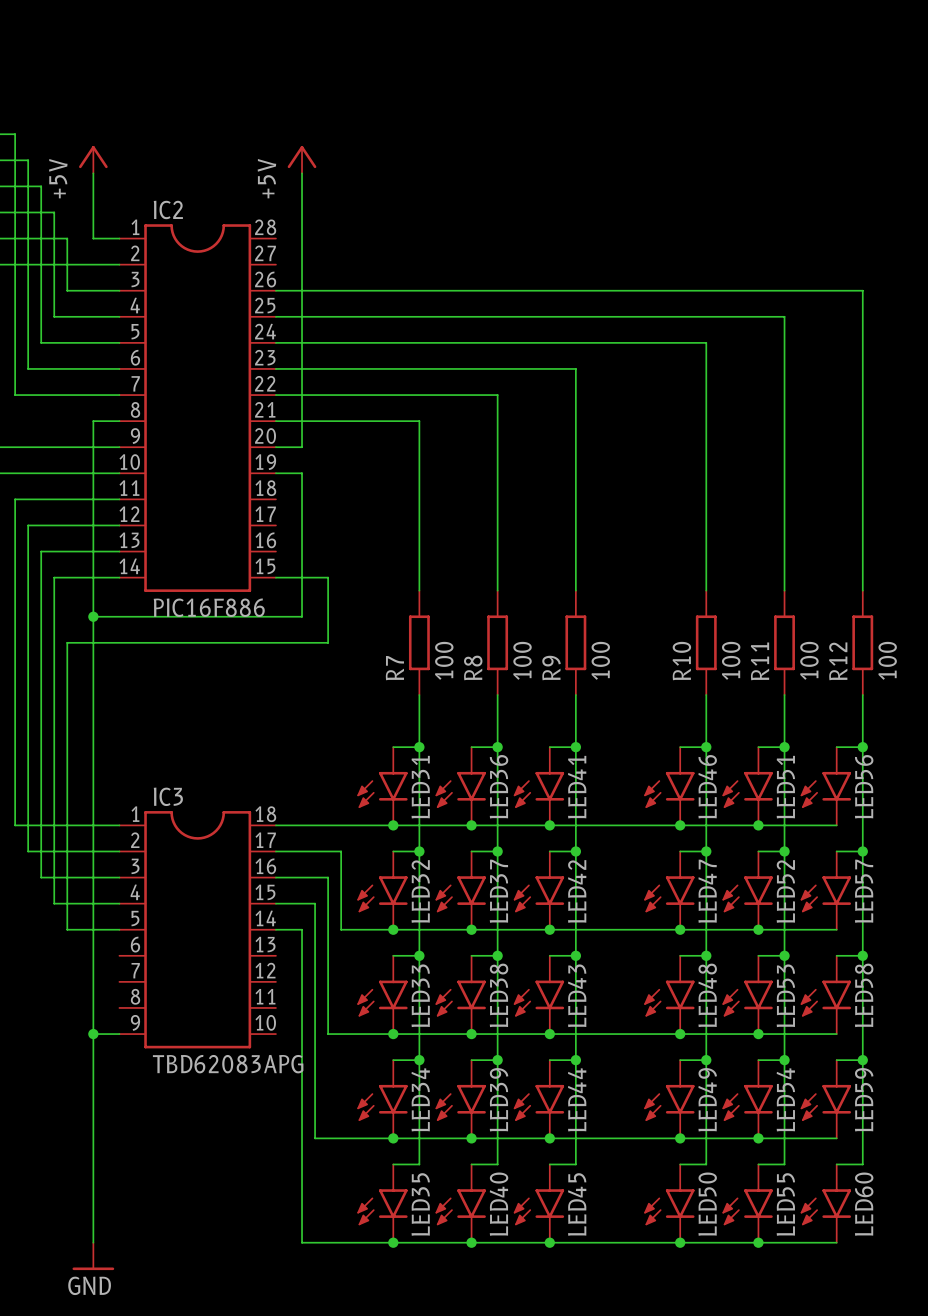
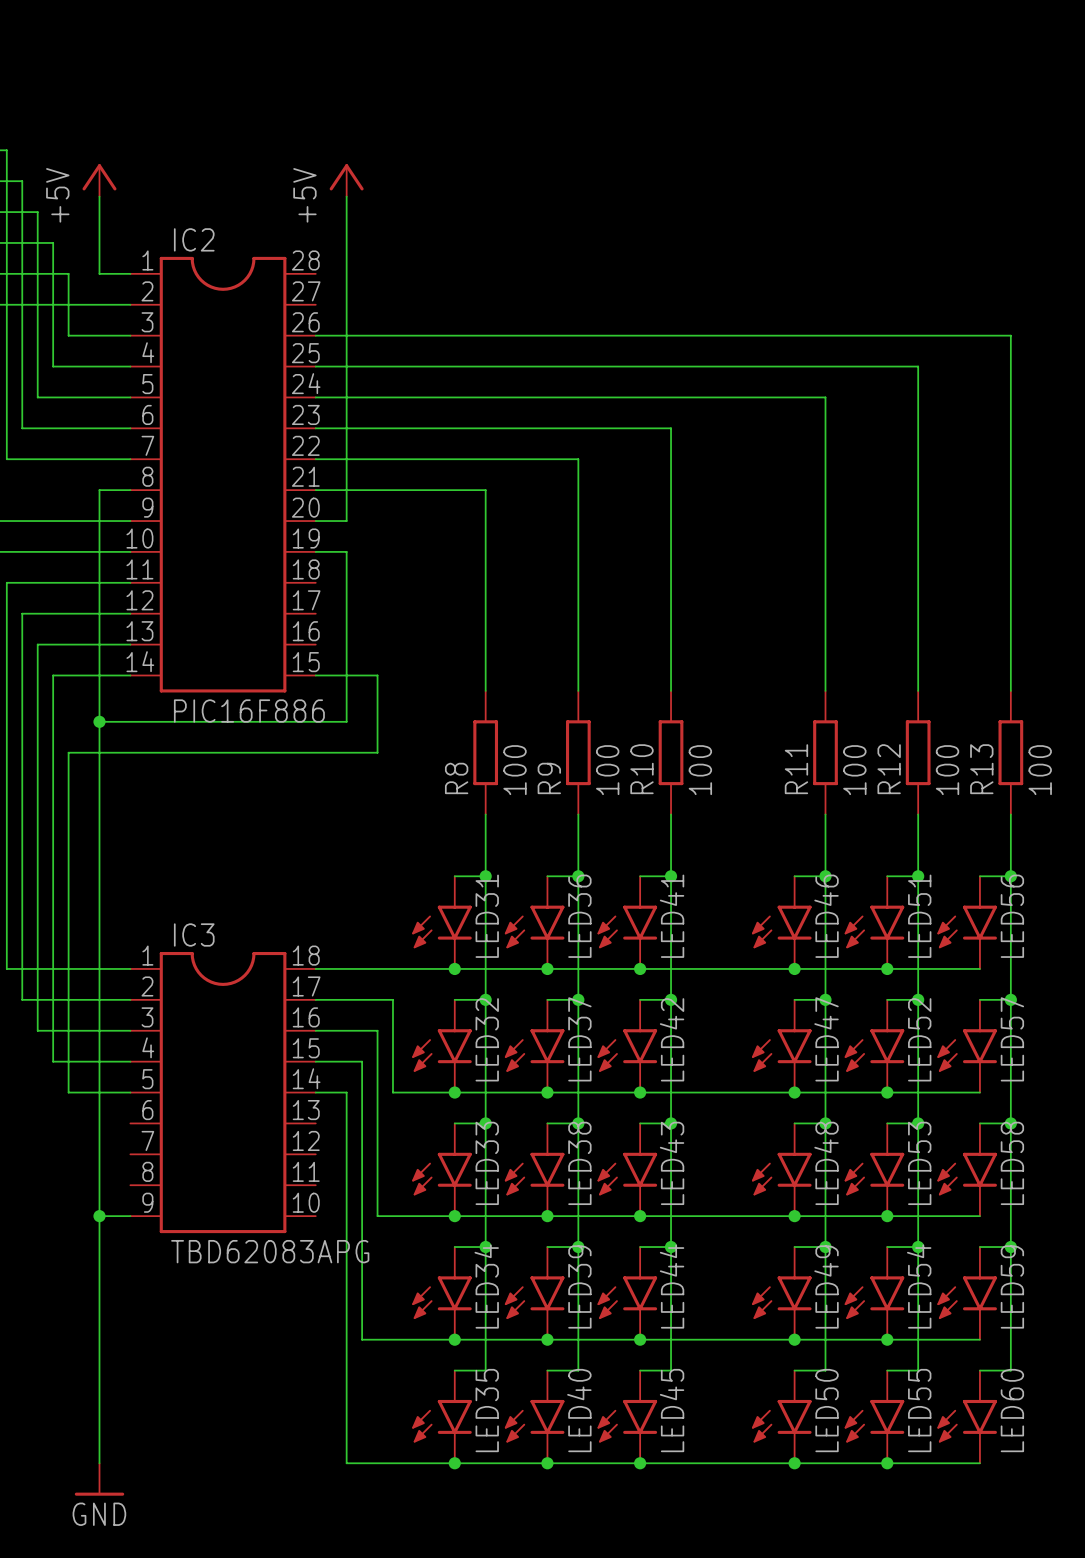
R10 name: R10 (681, 661) -> R11 (796, 769)
R11 name: R11 (760, 661) -> R12 (889, 769)
R12 name: R12 (838, 661) -> R13 (981, 769)
R8 name: R8 (473, 667) -> R9 (549, 778)
R7 name: R7 (394, 668) -> R8 (456, 778)
R9 name: R9 (551, 668) -> R10 (641, 769)

